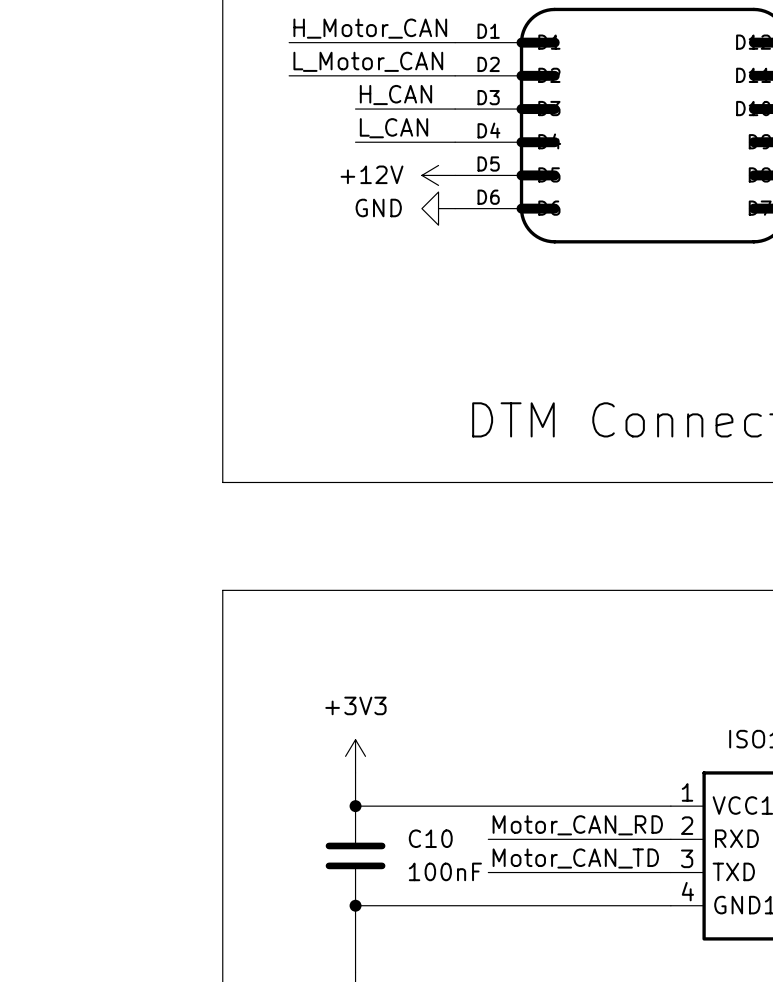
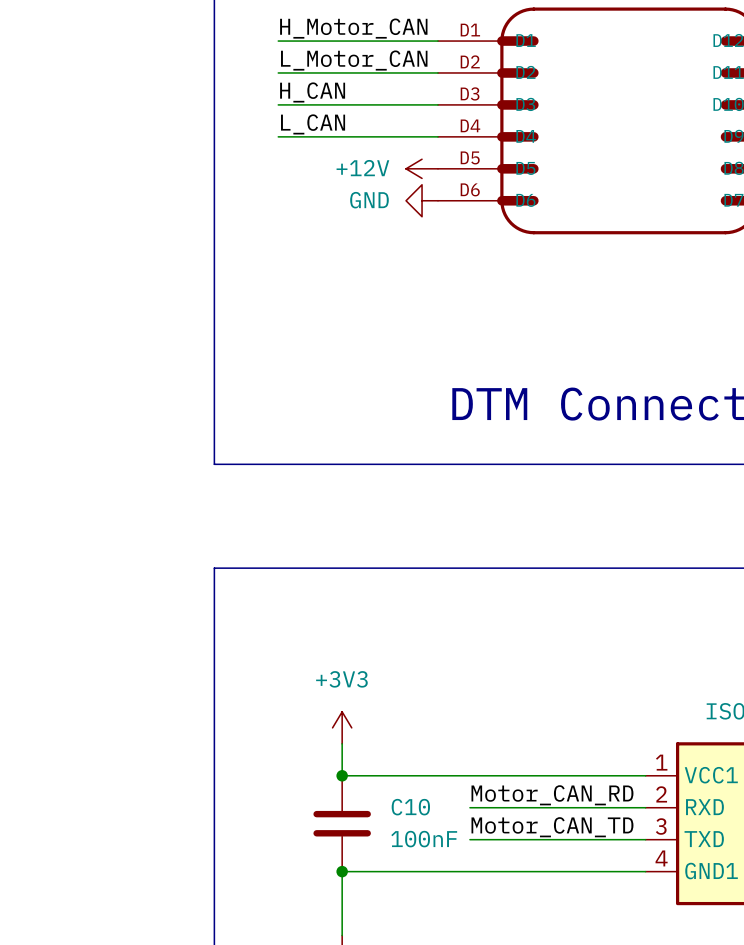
label position: H_CAN (395, 95) -> H_CAN (312, 92)
wire: none -> (278, 104) (342, 104)
label position: L_CAN (394, 128) -> L_CAN (313, 124)
wire: none -> (278, 136) (342, 136)

